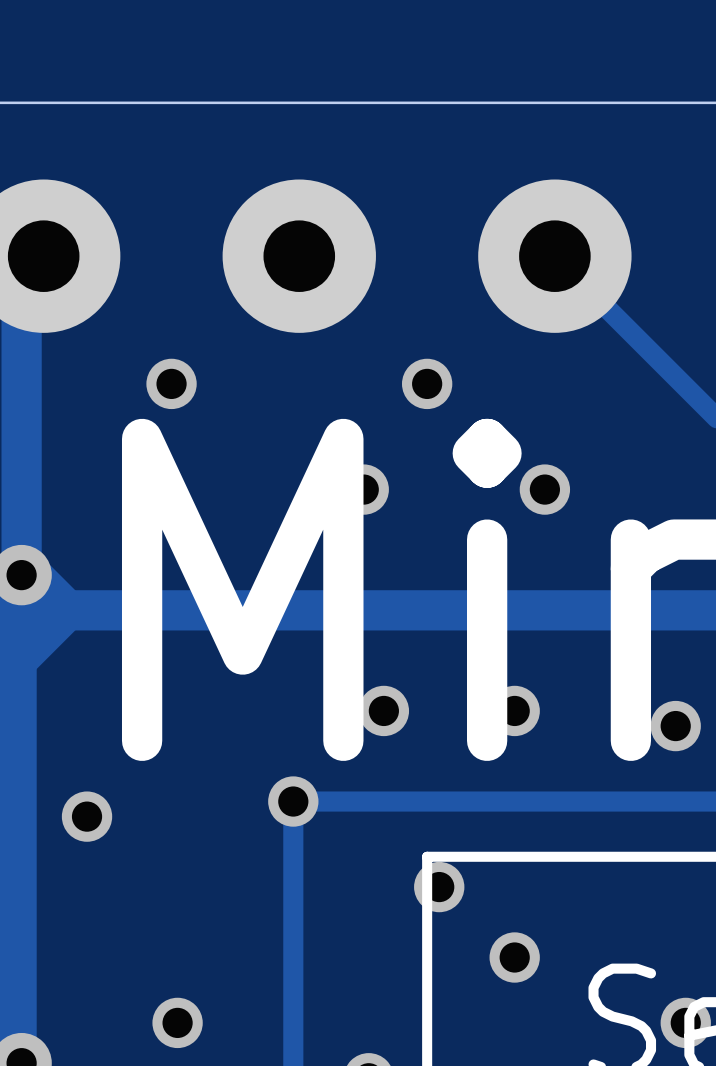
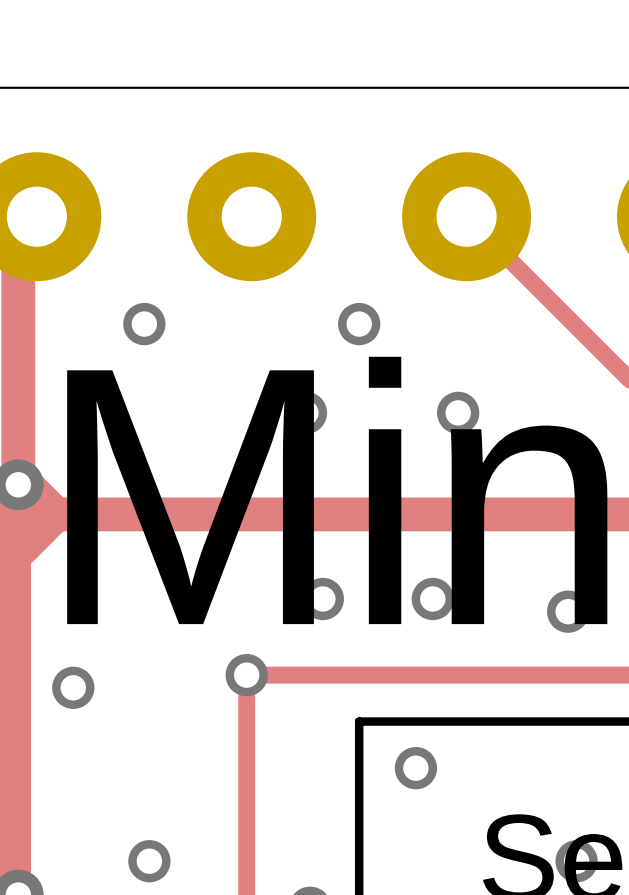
via: (439, 887) -> none
via position: (514, 957) -> (415, 768)

